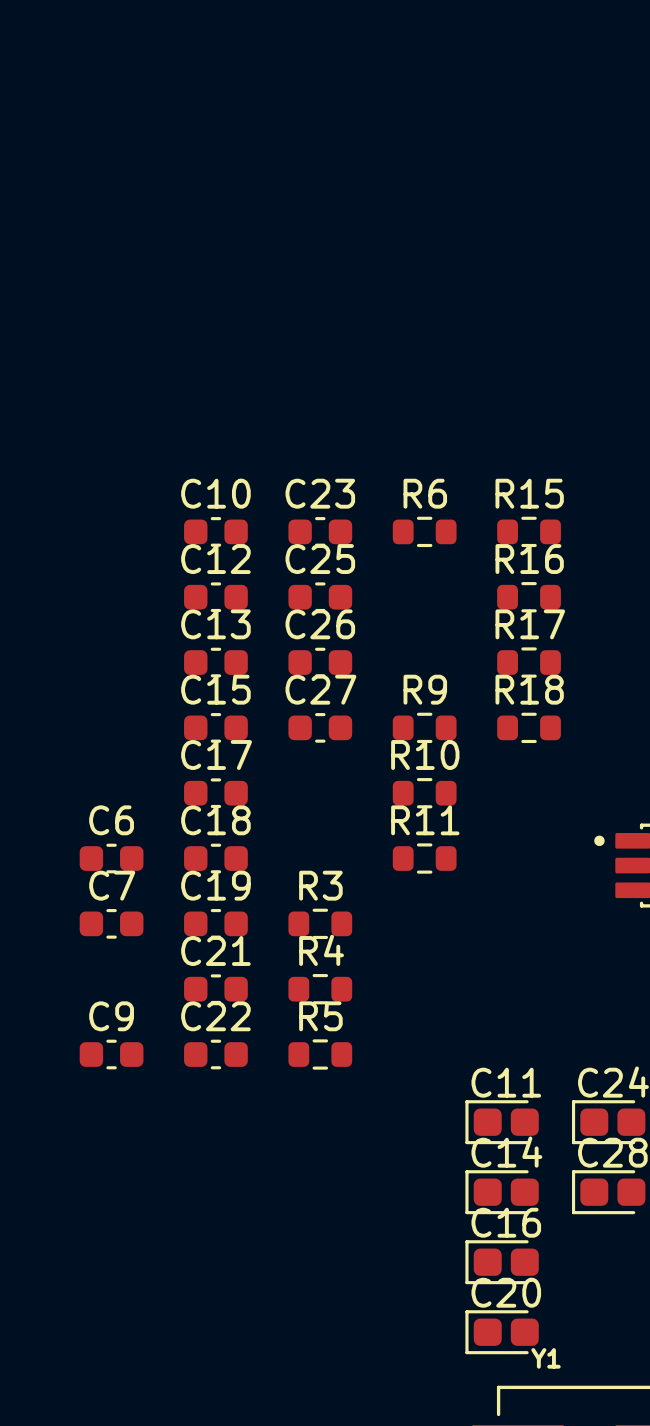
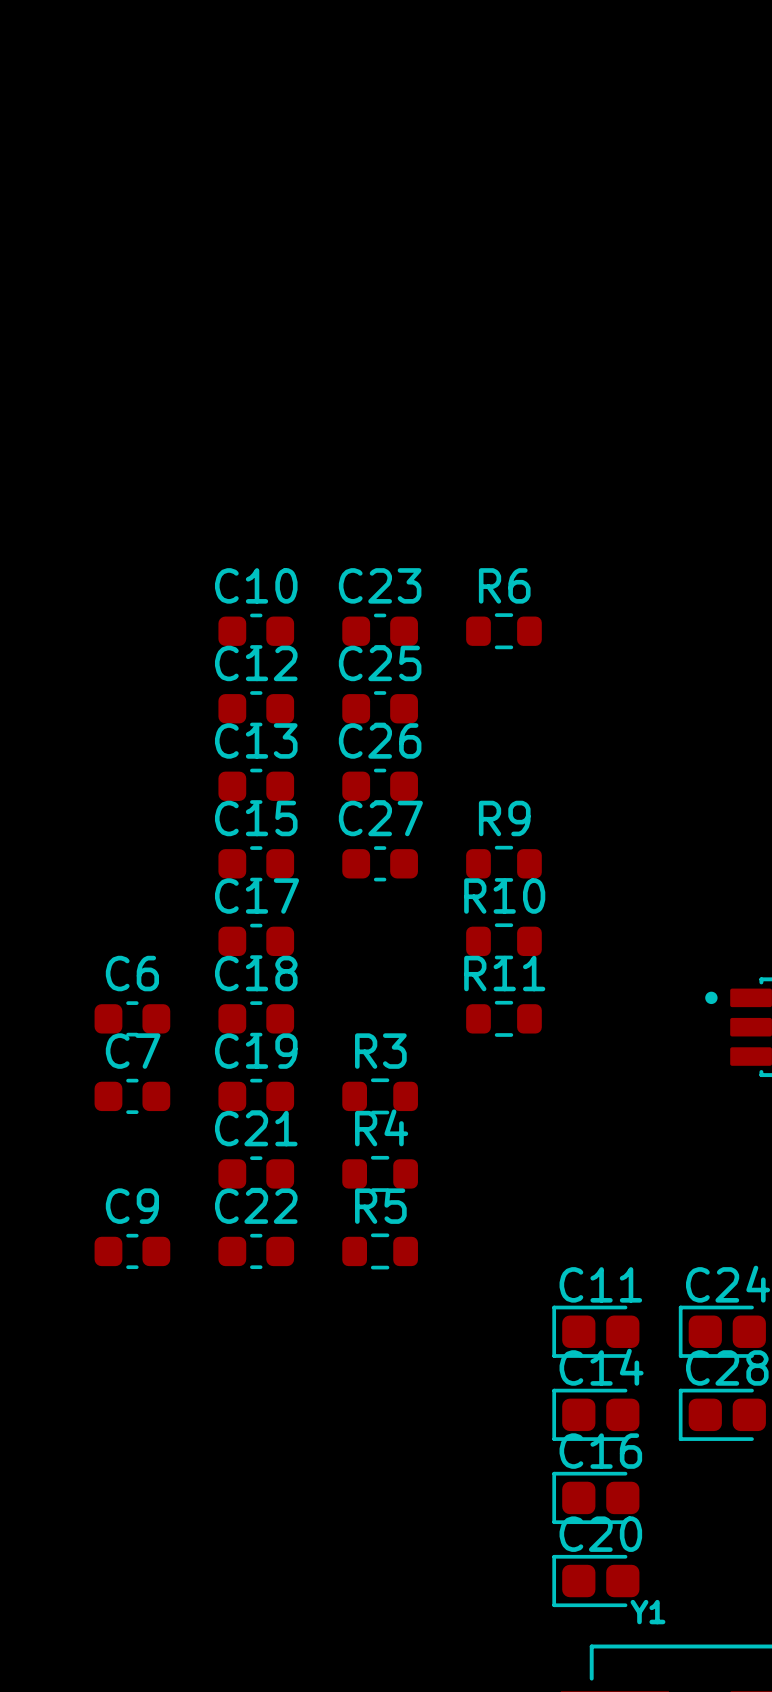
R15: (529, 531) -> none
R16: (529, 597) -> none
R17: (529, 662) -> none
R18: (529, 727) -> none

